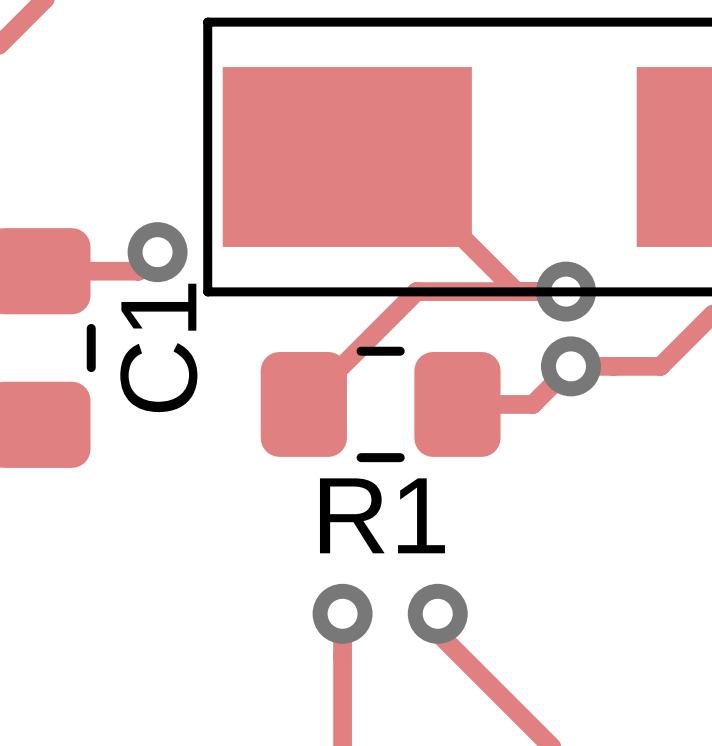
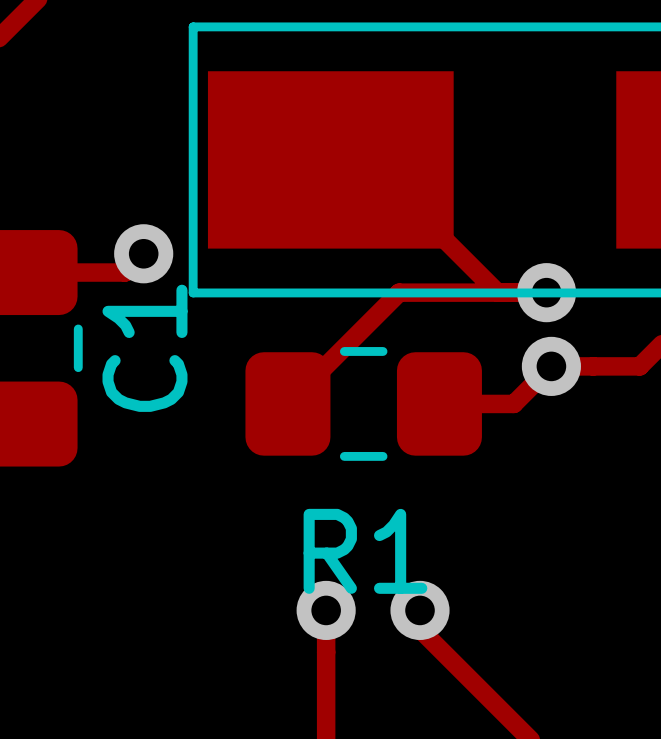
R1 name position: R1 (382, 515) -> R1 (365, 551)

